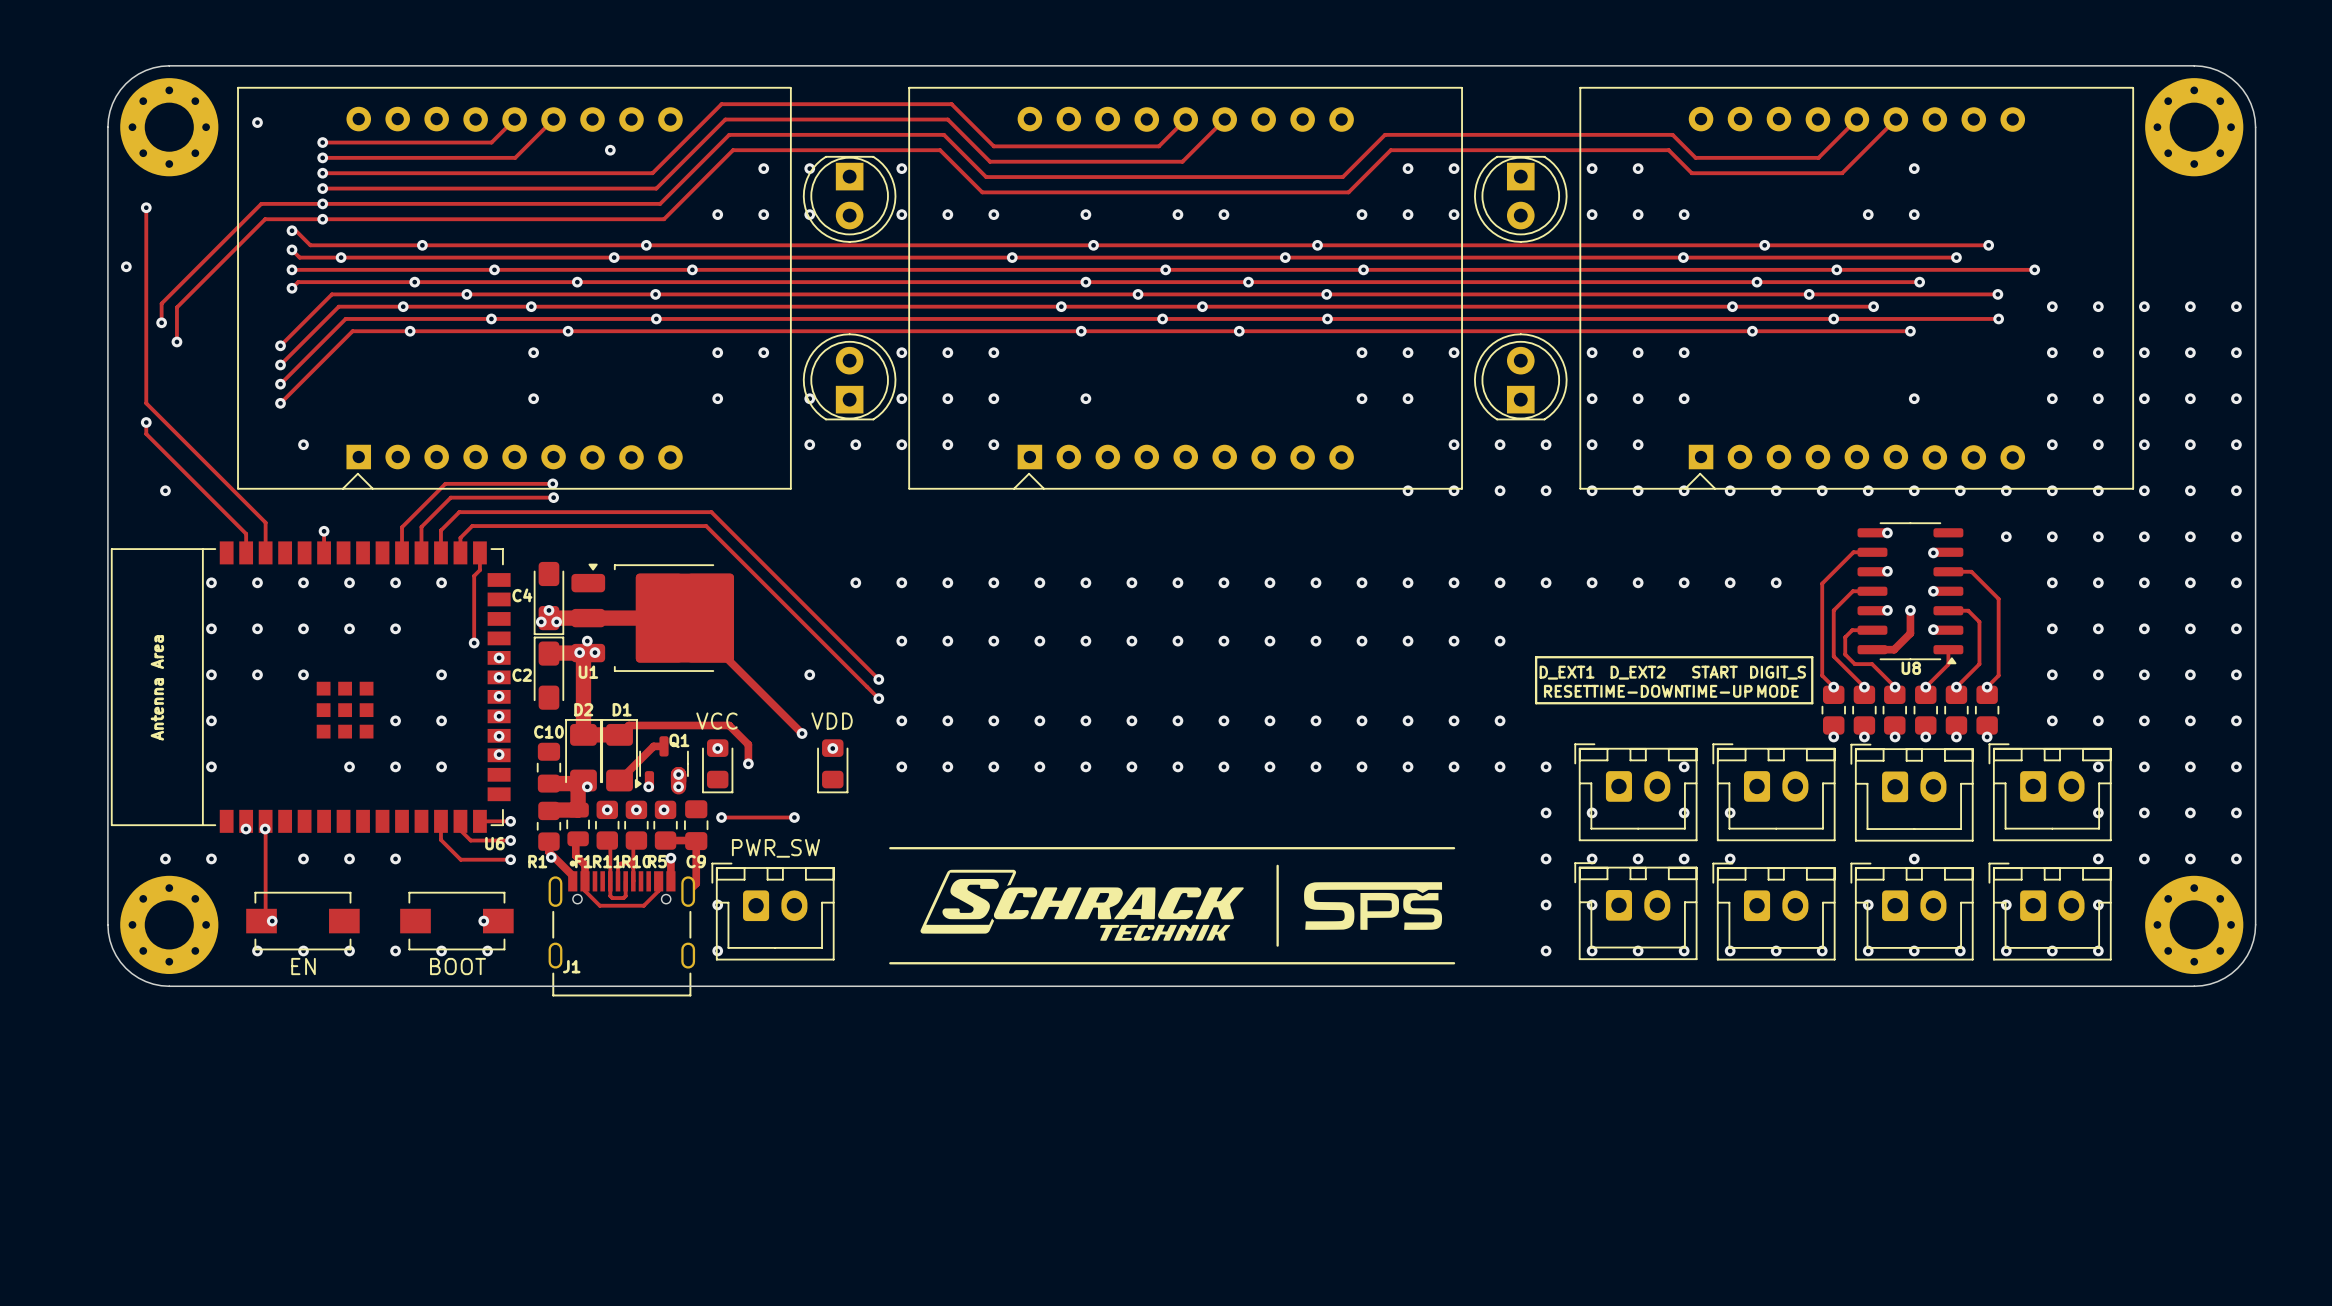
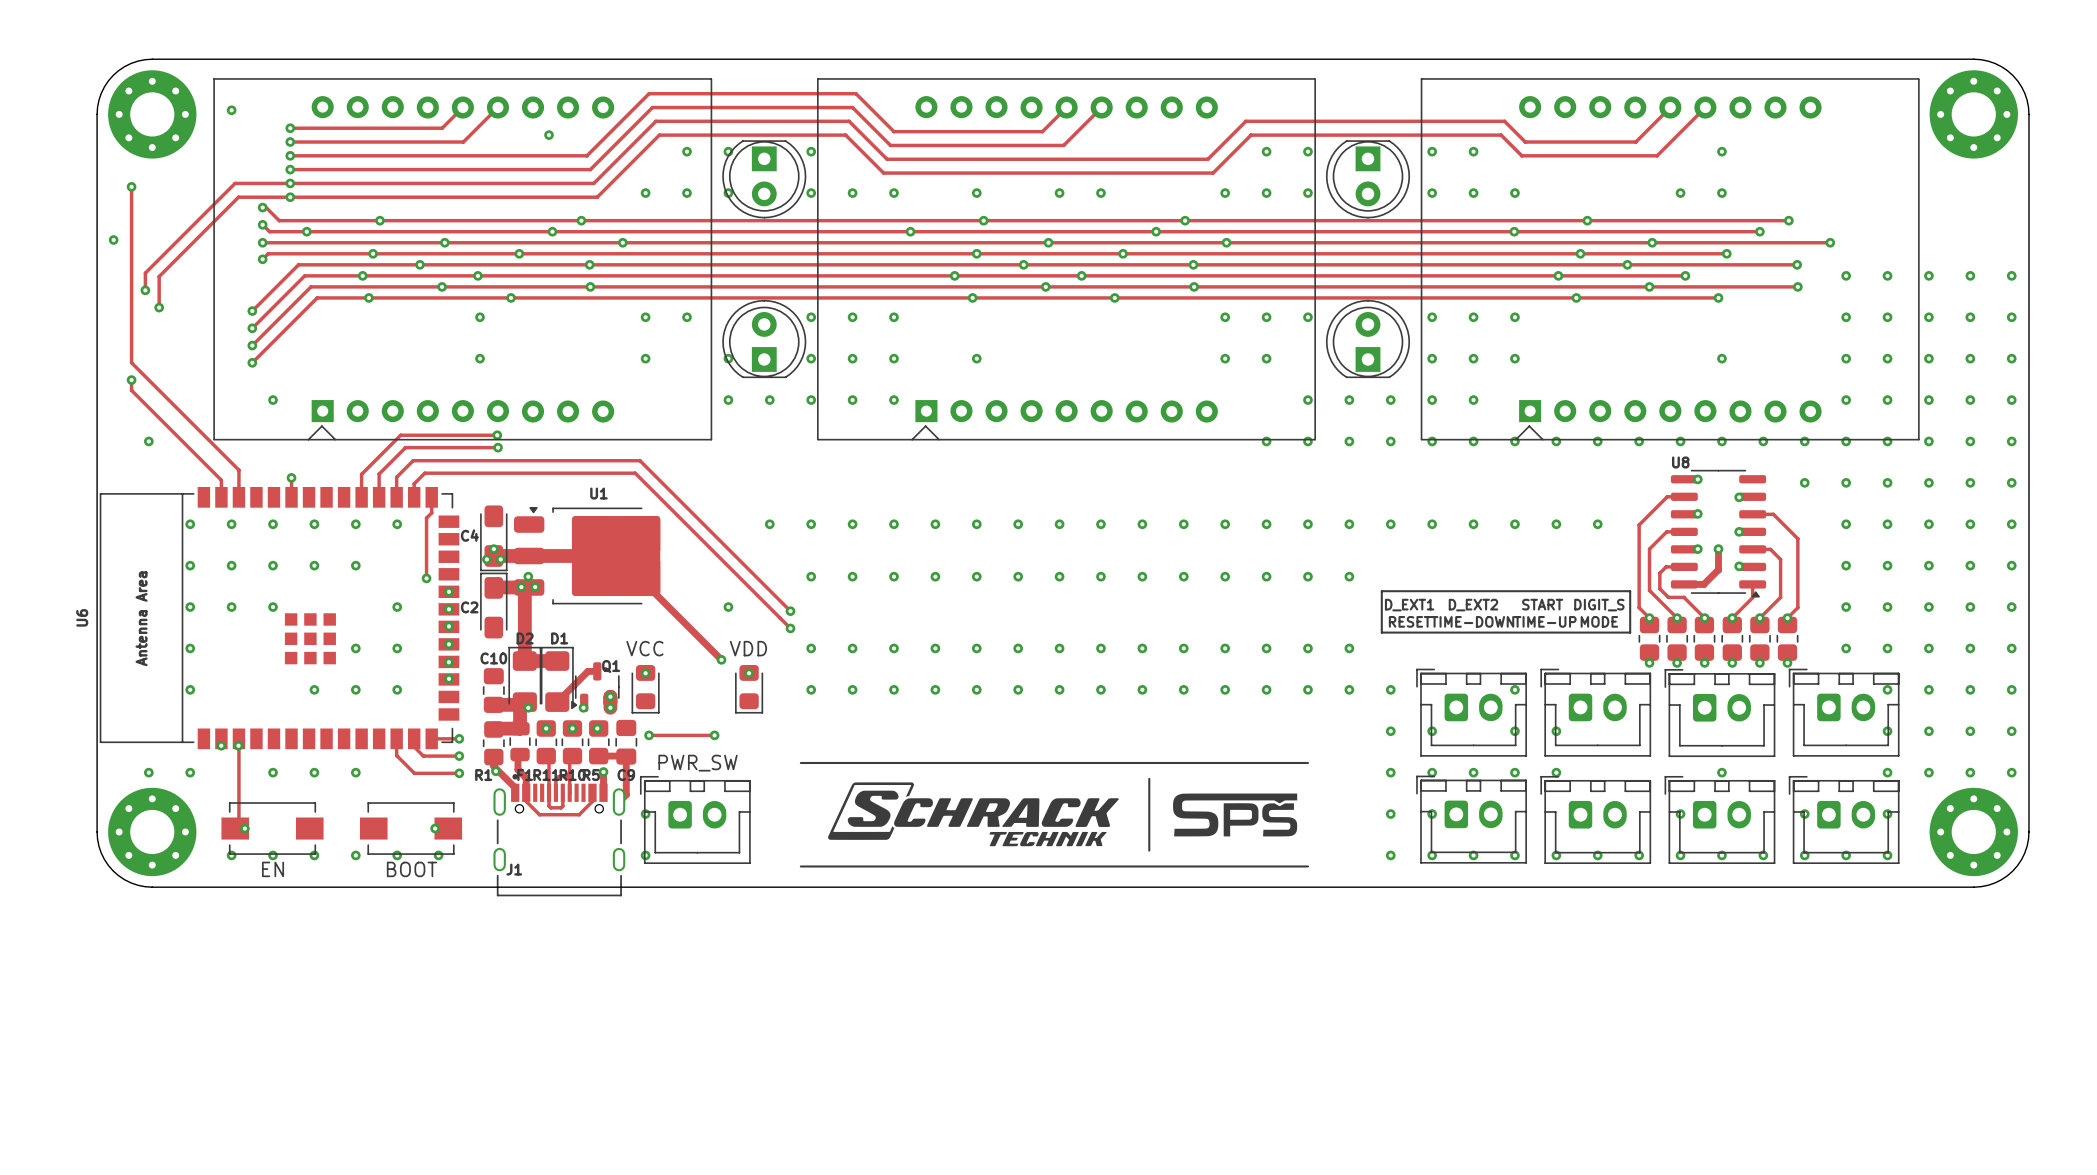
U8 name position: U8 (1911, 668) -> U8 (1680, 462)
U1 name position: U1 (588, 672) -> U1 (598, 493)
track: (619, 734) (628, 725) (729, 725) (748, 744) (748, 763) -> none
via: (748, 763) -> none
U6 name rotation: 0° (494, 843) -> 90° counterclockwise (82, 617)
U6 name position: U6 (494, 843) -> U6 (82, 617)

